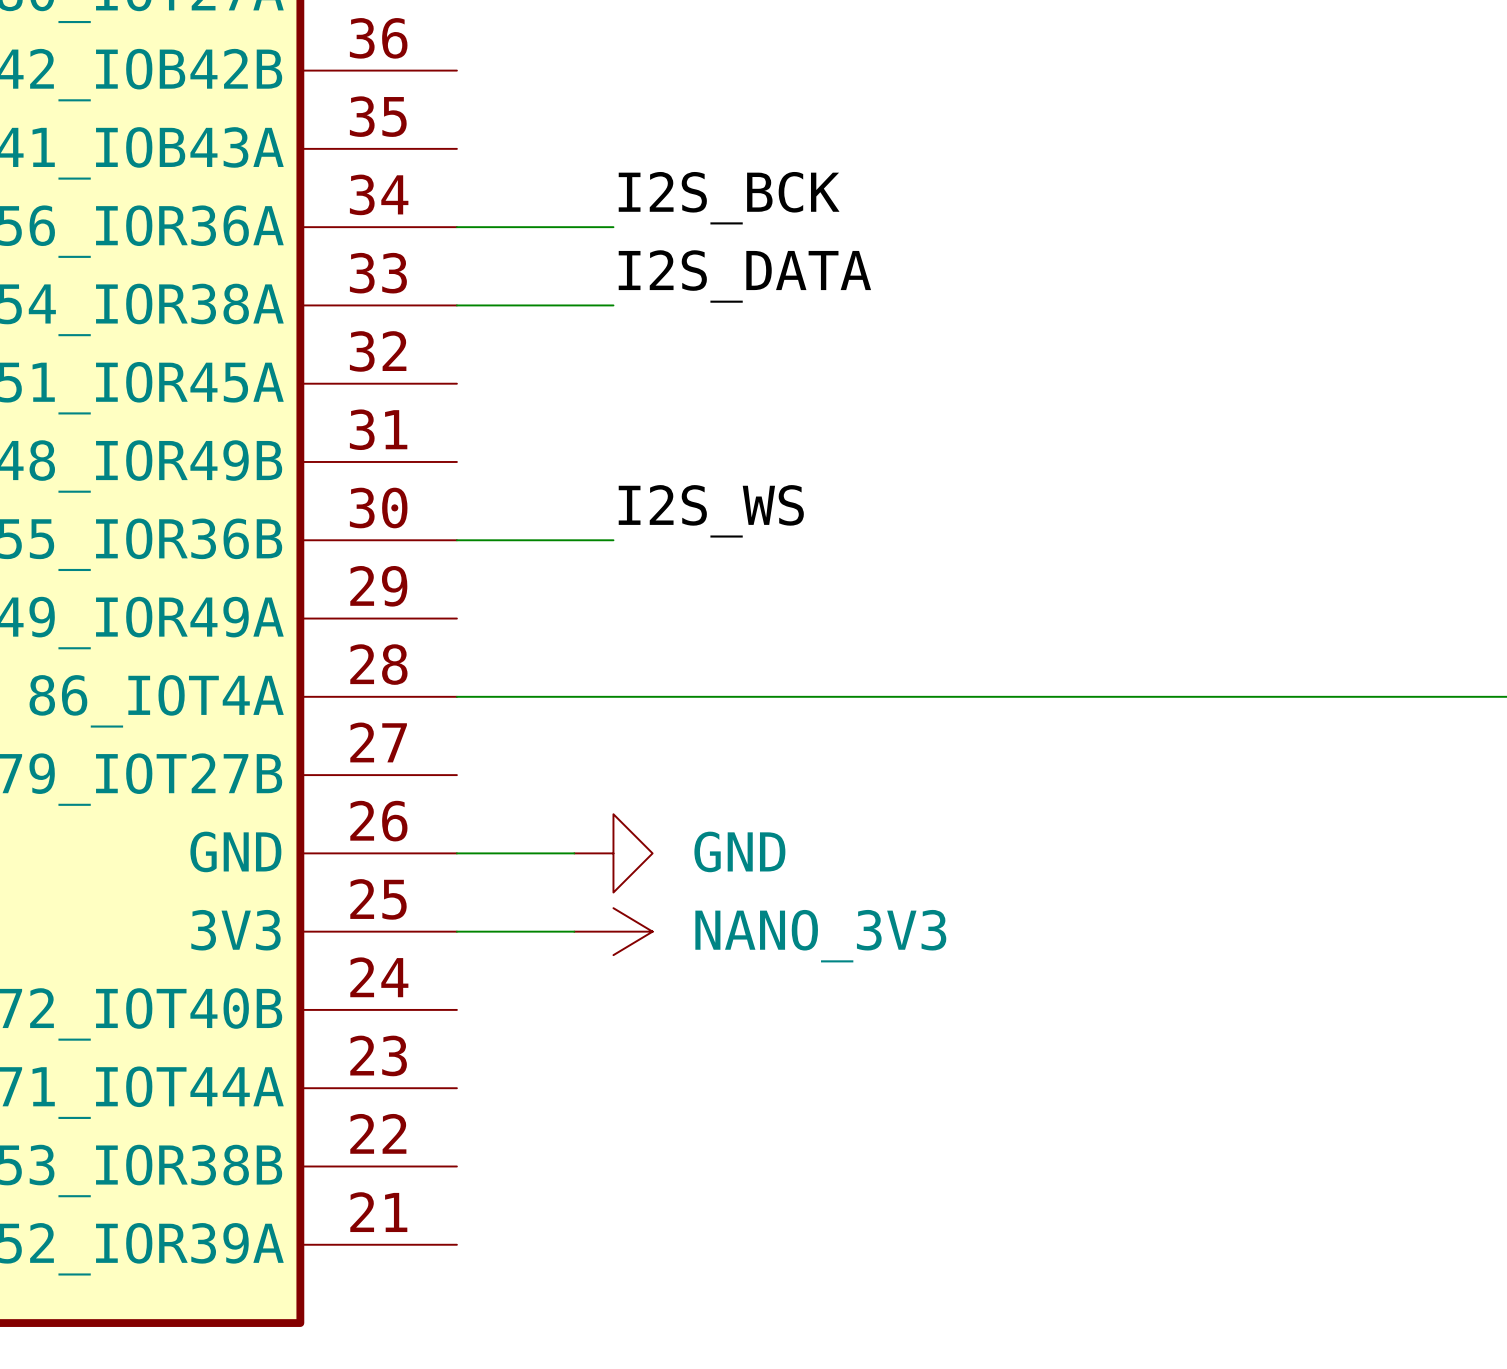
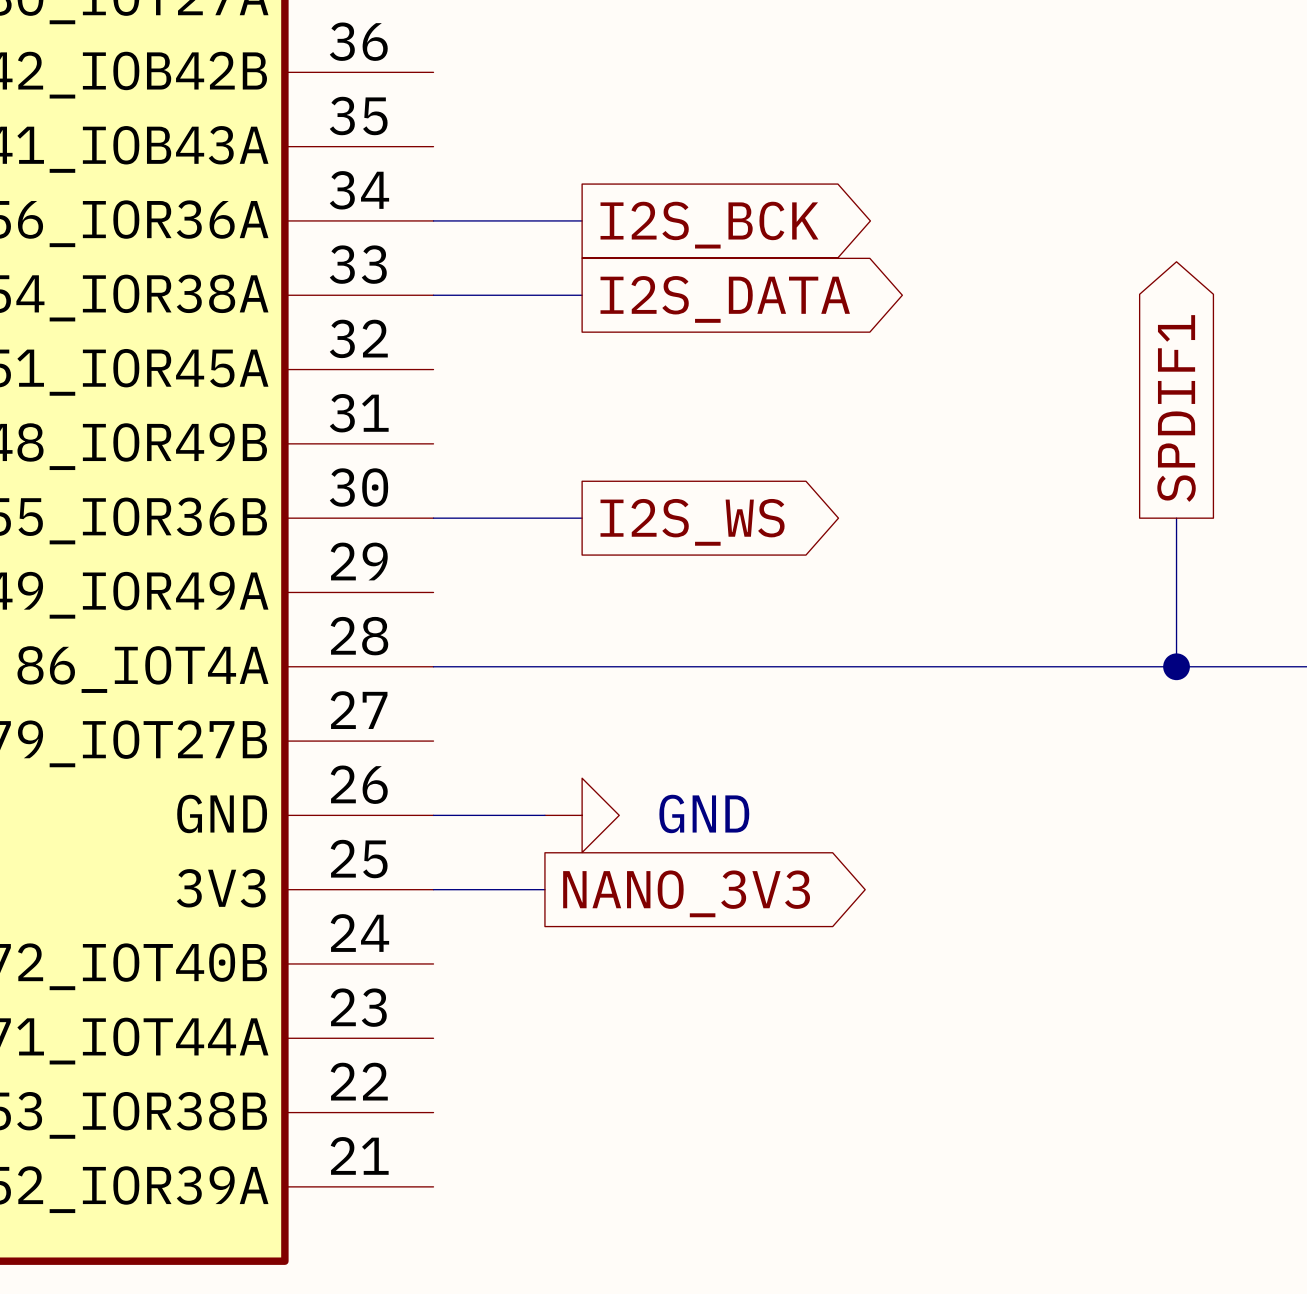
label: I2S_BCK (729, 198) -> none
global label: none -> I2S_BCK (709, 225)
label: I2S_DATA (744, 276) -> none
global label: none -> I2S_DATA (725, 299)
global label: none -> SPDIF1 (1176, 408)
label: I2S_WS (711, 511) -> none
wire: none -> (1176, 518) (1176, 666)
global label: none -> I2S_WS (692, 522)
junction: none -> (1176, 666)
power symbol: NANO_3V3 (613, 931) -> none
global label: none -> NANO_3V3 (686, 893)

